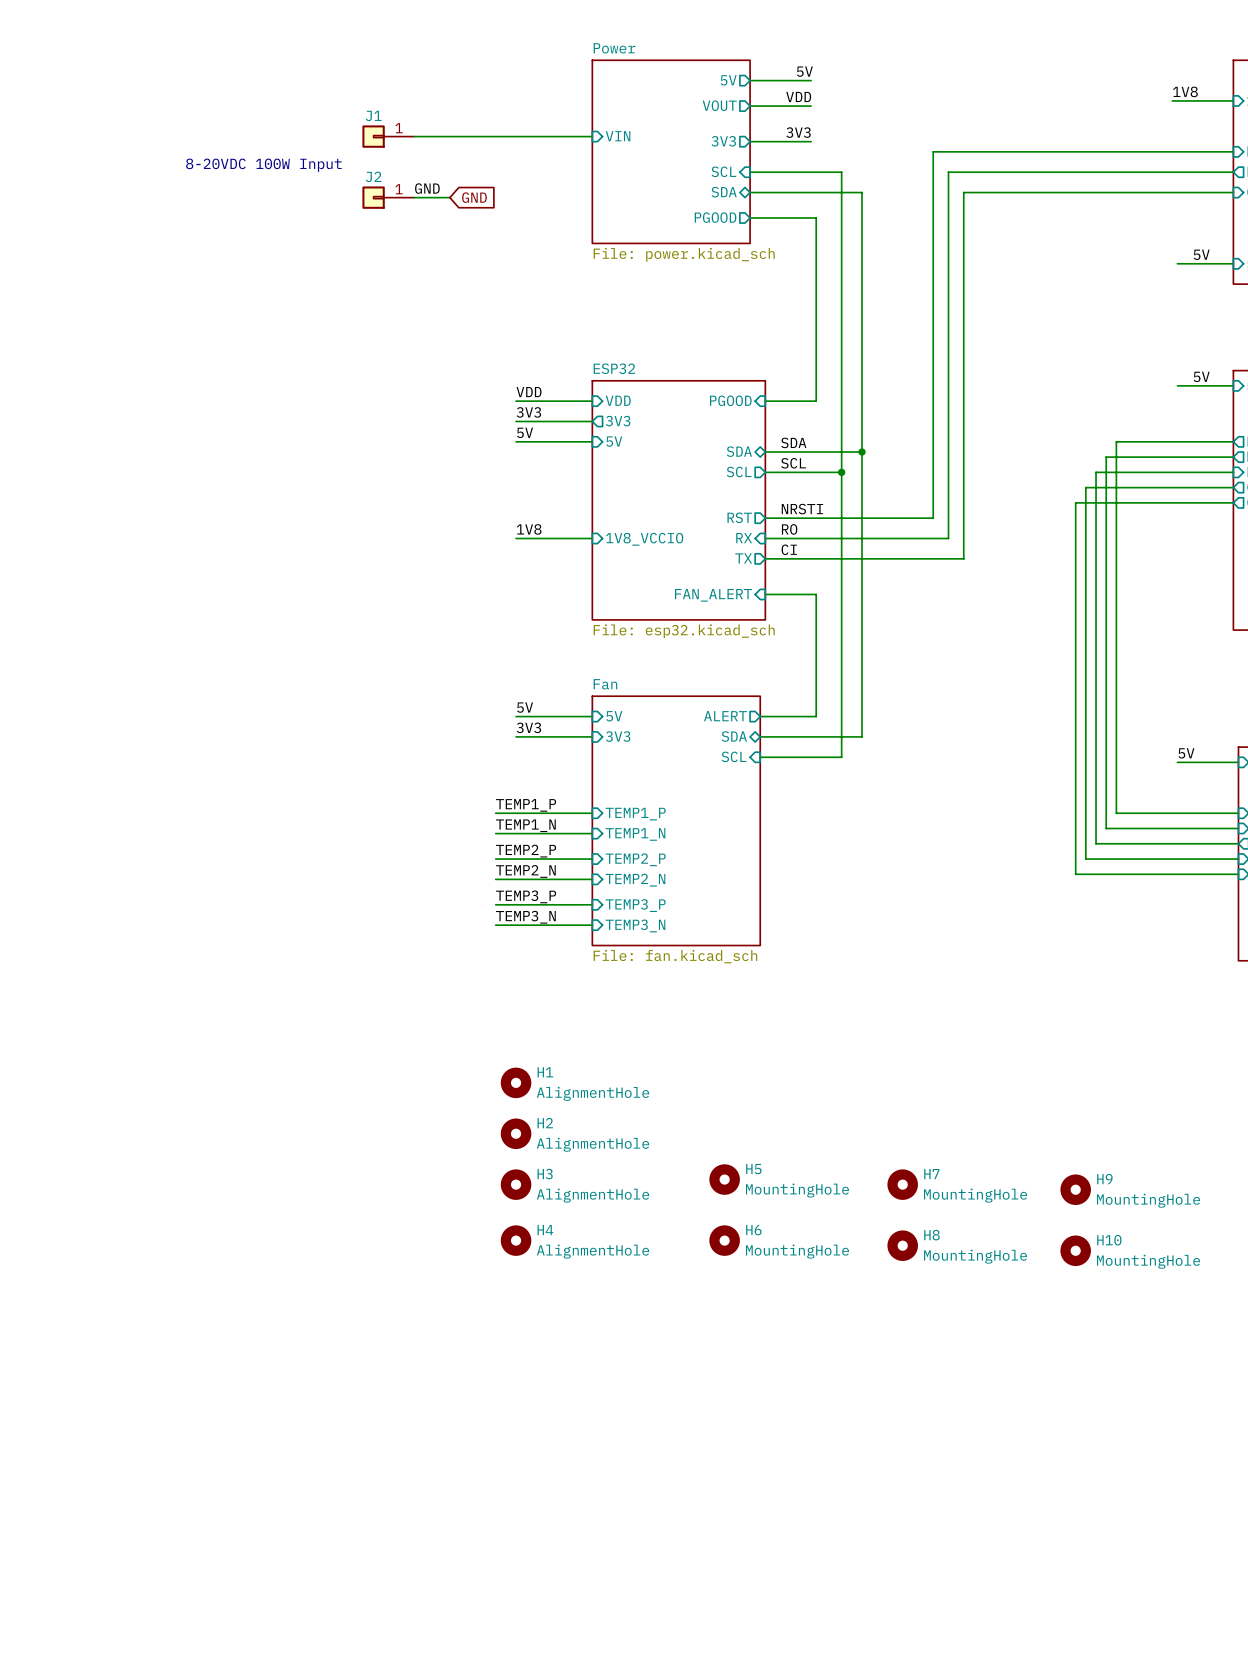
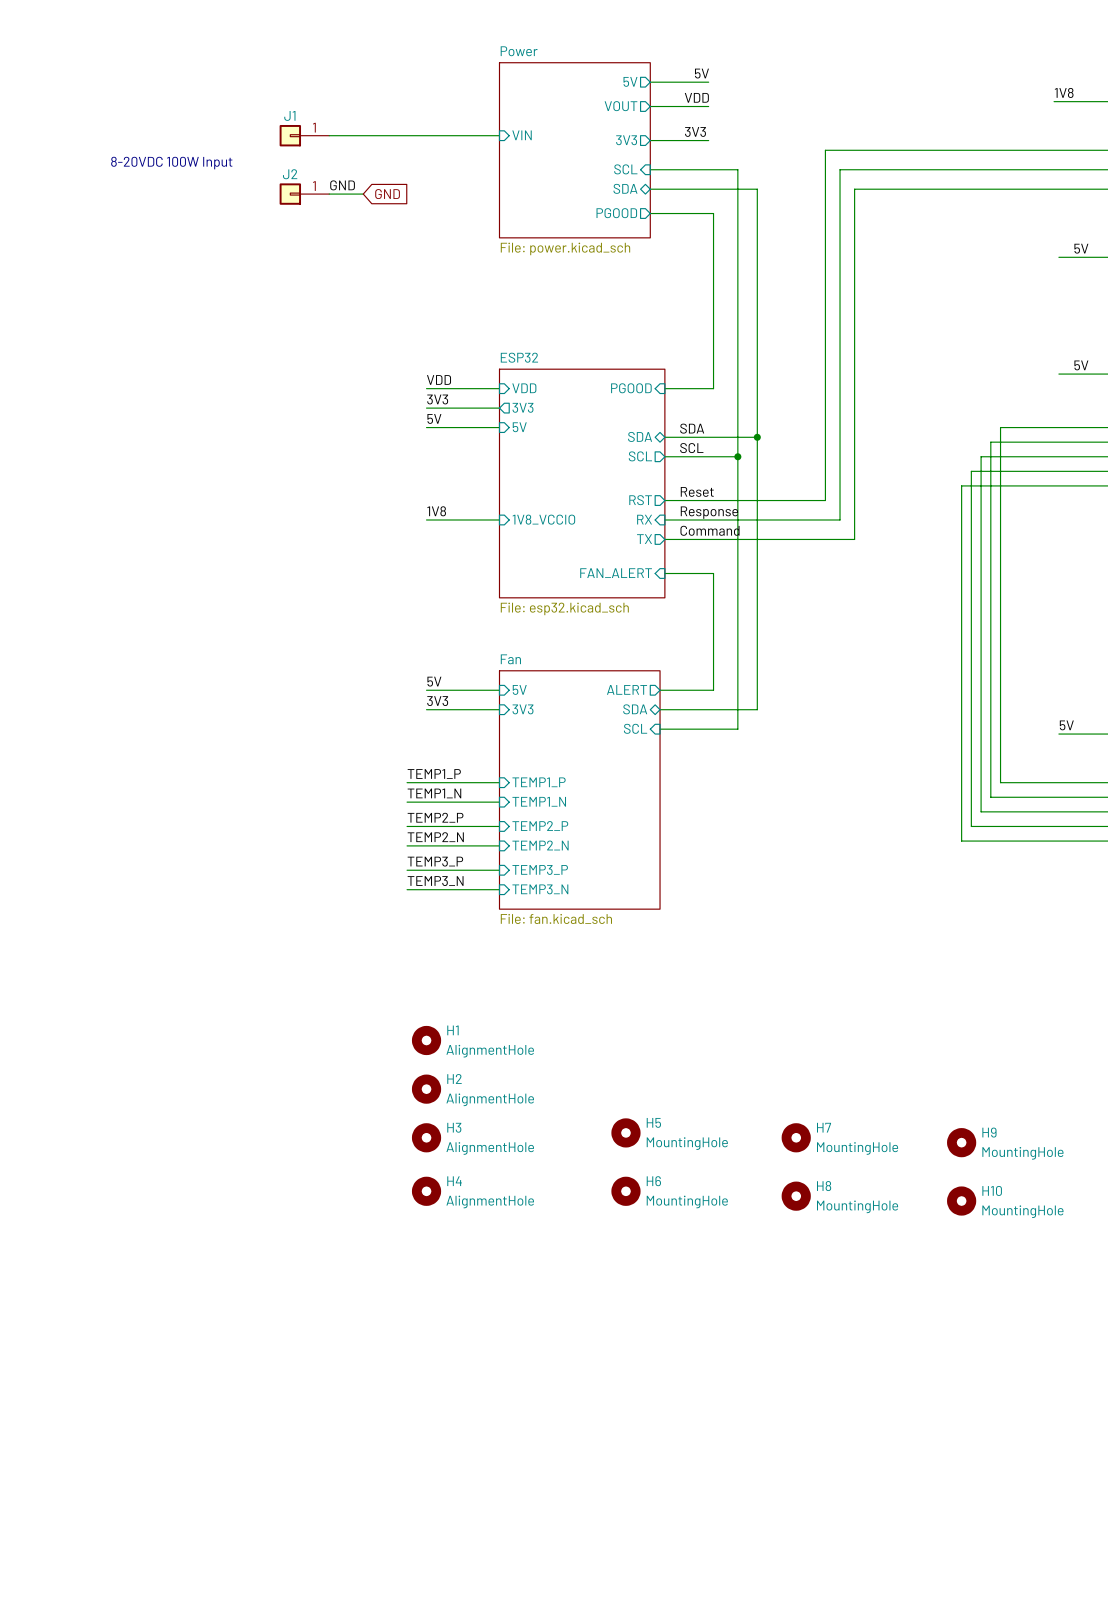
label: NRSTI (802, 509) -> Reset (697, 491)
label: RO (789, 529) -> Response (709, 512)
label: CI (789, 549) -> Command (710, 530)

